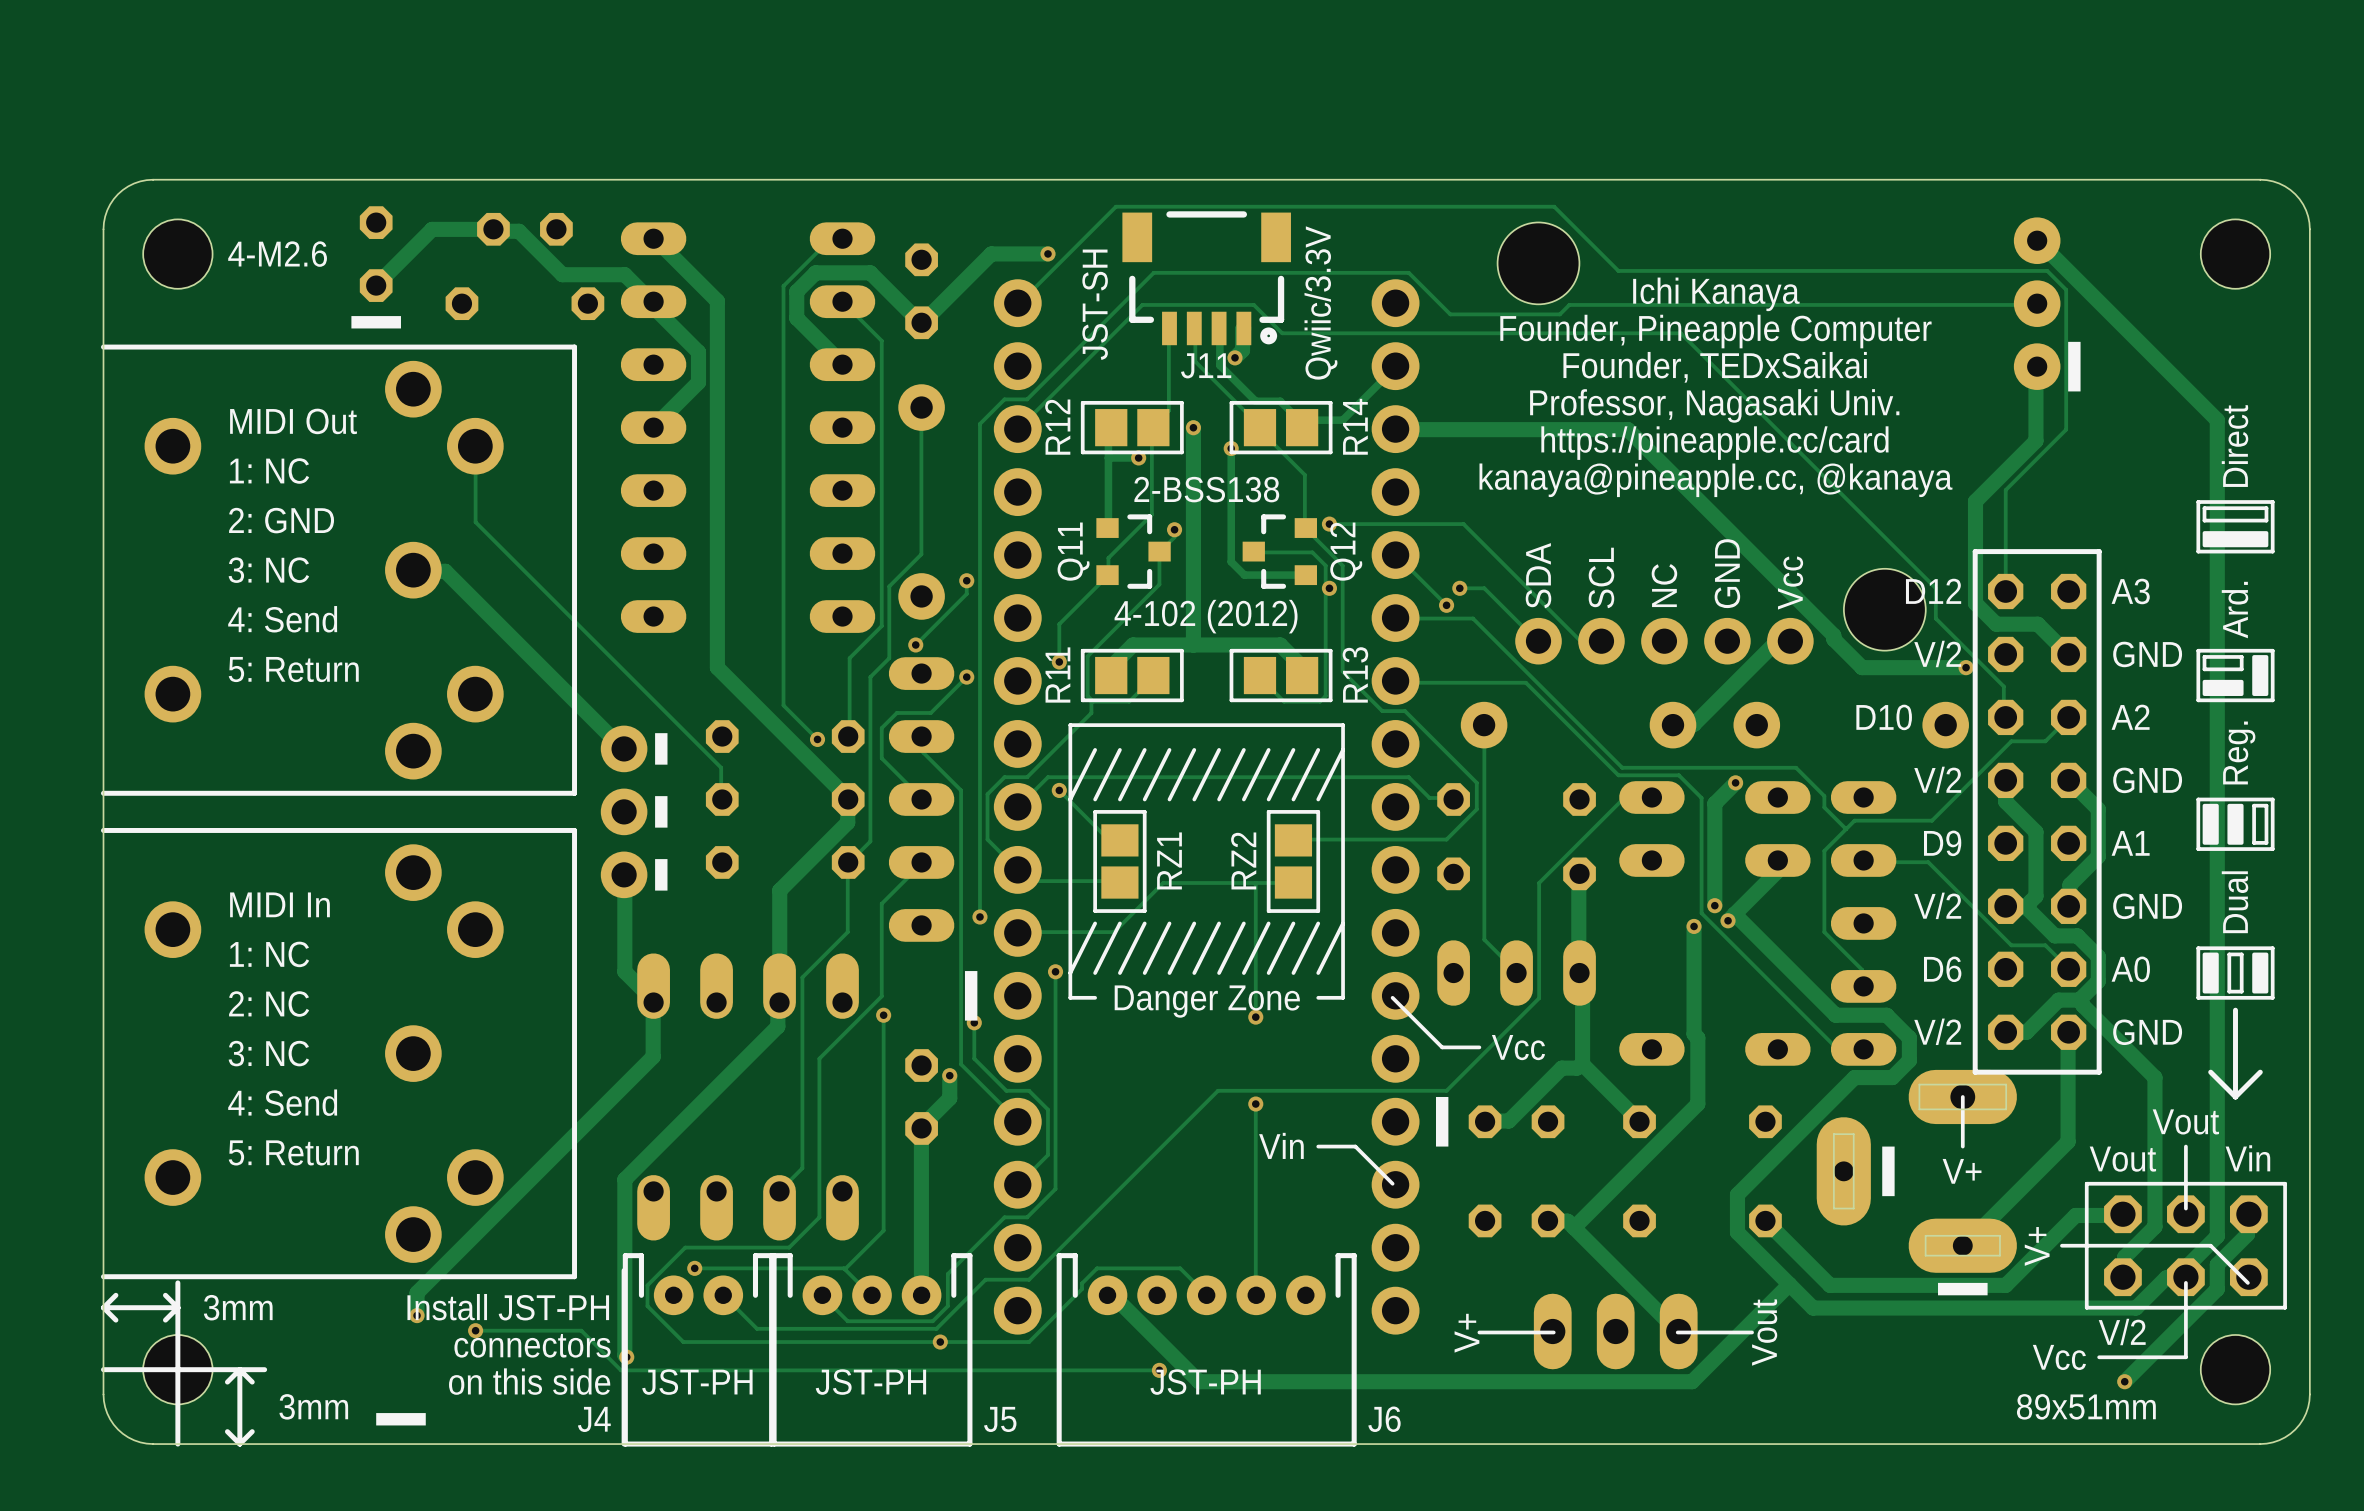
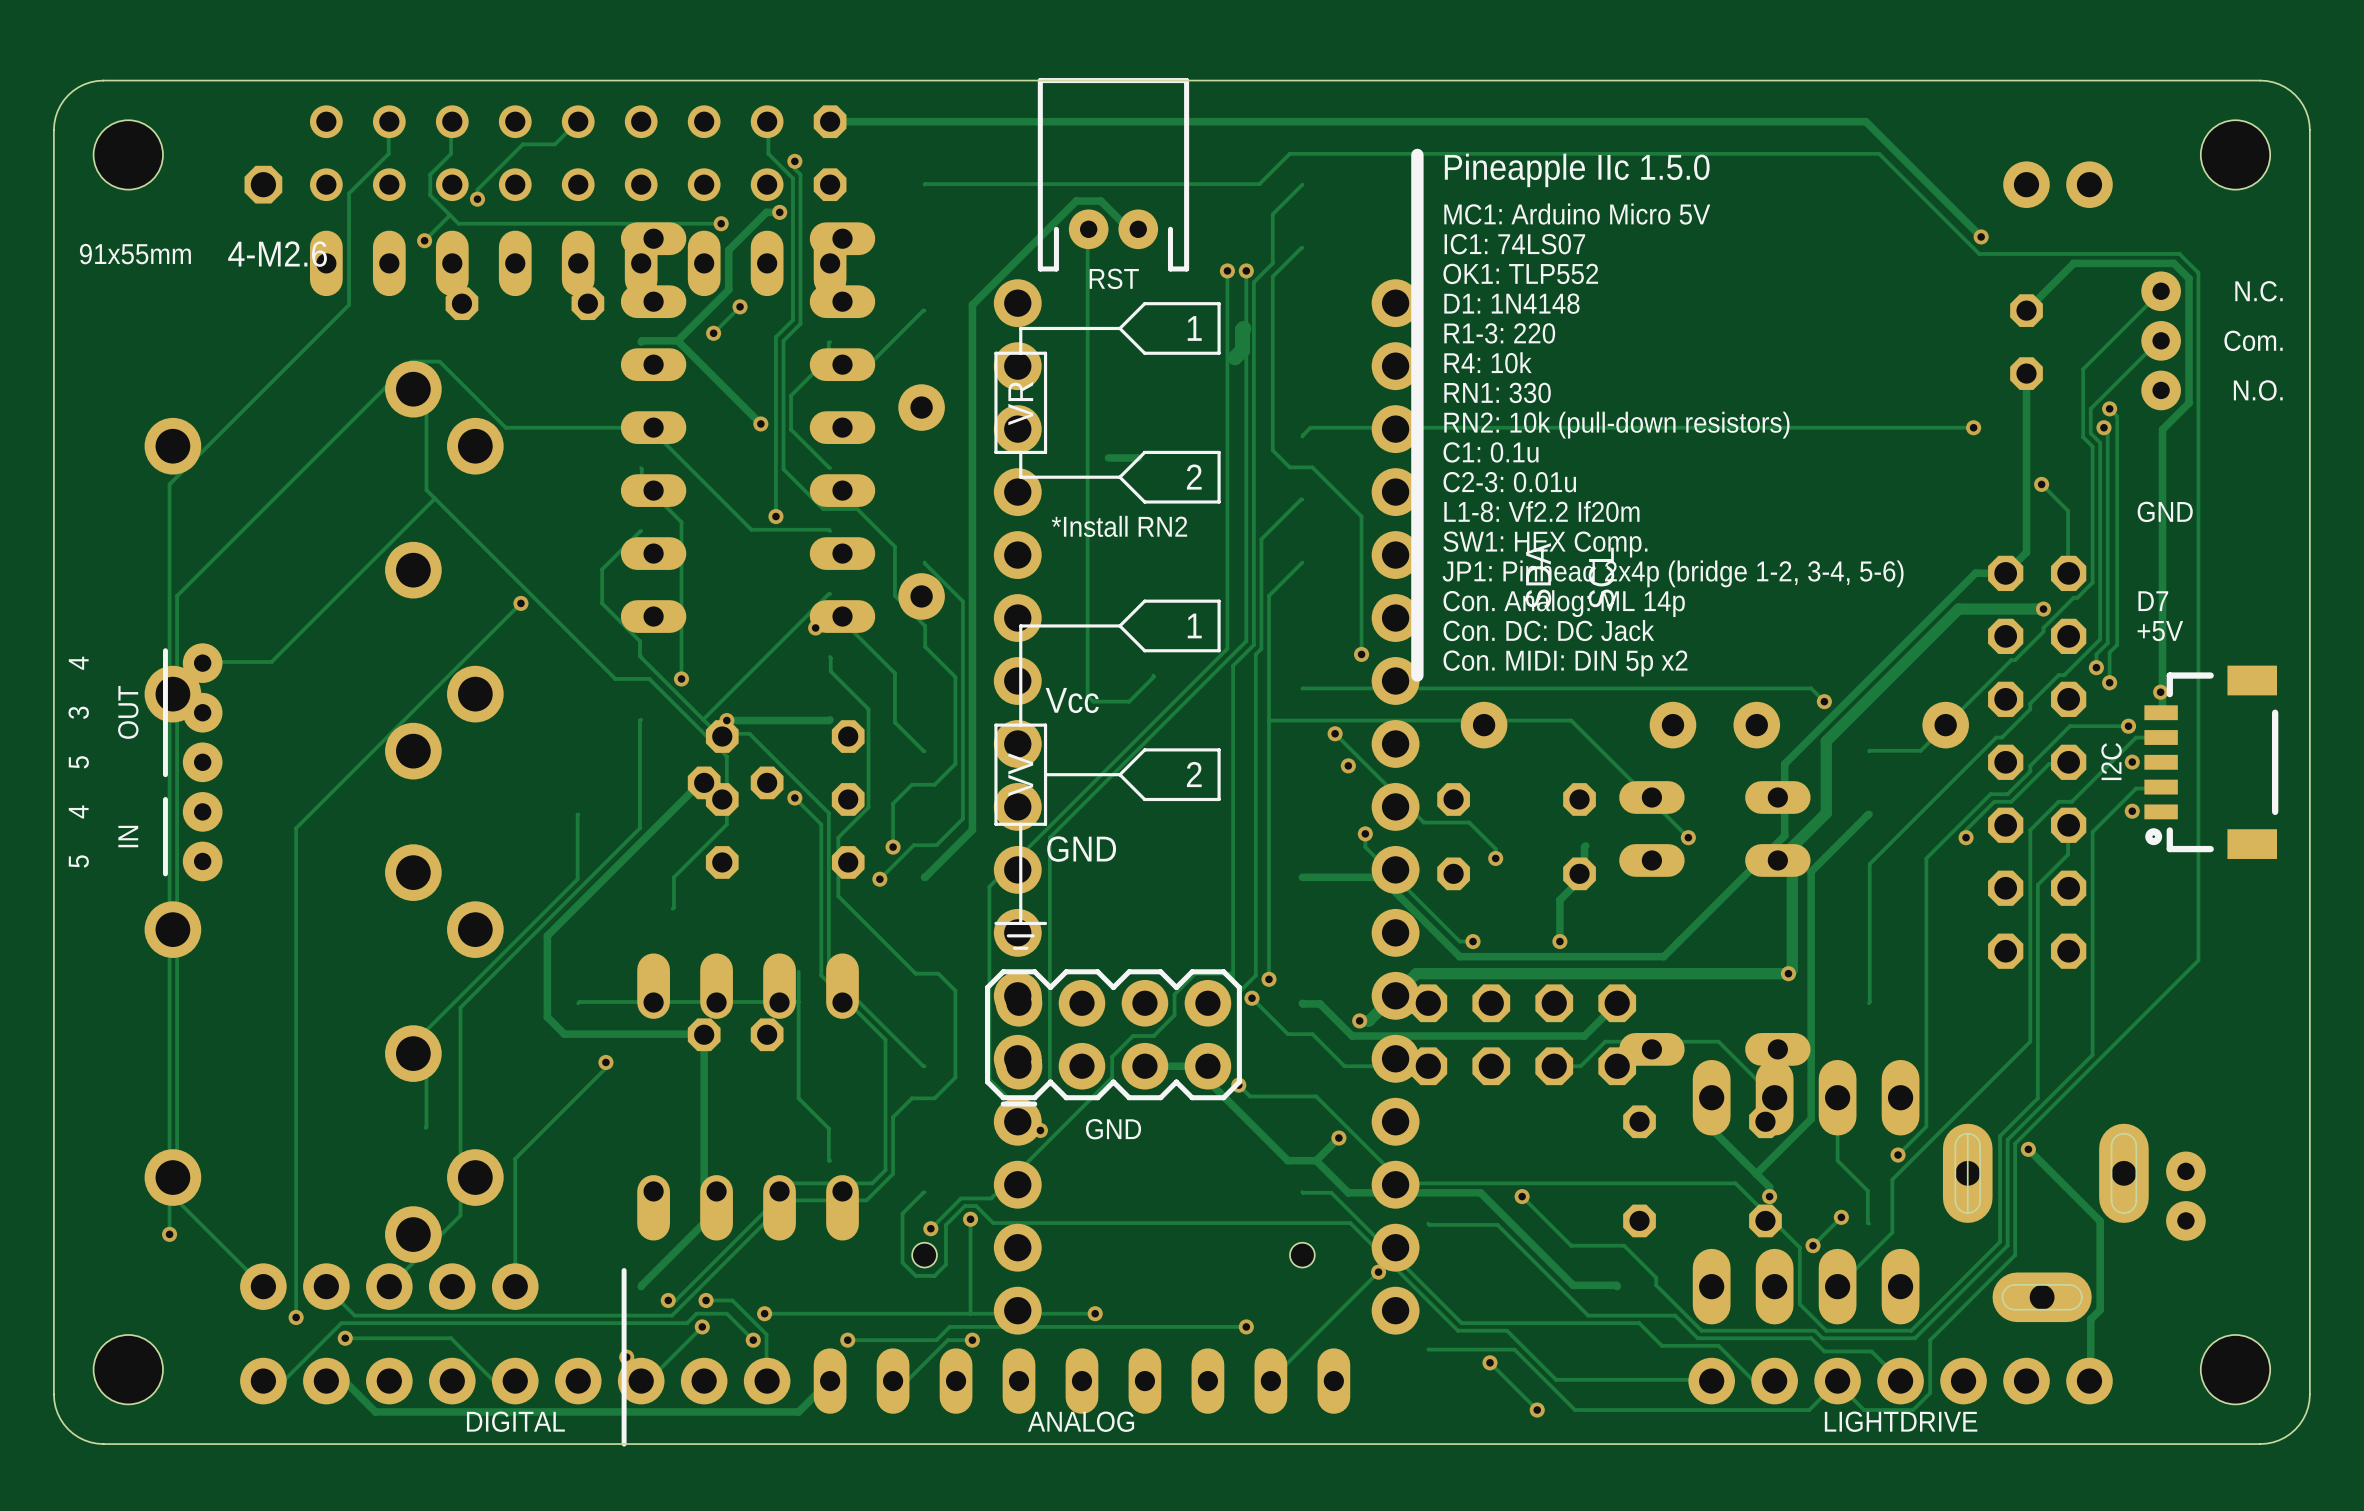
track: none -> (389, 121) (388, 153) (349, 193) (349, 304) (169, 484) (169, 1234)
track: none -> (452, 121) (451, 153) (430, 174) (430, 195) (458, 223) (721, 223)
track: none -> (578, 121) (554, 144) (522, 144) (477, 189) (477, 199)
track: none -> (767, 121) (768, 153) (792, 178) (792, 320) (775, 337) (775, 516)
track: none -> (830, 121) (1865, 121) (1981, 236)
part: none -> (326, 153)
part: none -> (389, 153)
part: none -> (452, 153)
part: none -> (515, 153)
part: none -> (578, 153)
part: none -> (641, 153)
part: none -> (704, 153)
part: none -> (767, 153)
part: none -> (830, 153)
line: none -> (1417, 154) (1417, 675)
via: none -> (794, 161)
text: none -> Pineapple IIc 1.5.0 (1577, 170)
RST: none -> (1113, 174)
part: none -> (263, 184)
track: none -> (924, 184) (1259, 184) (1289, 153) (1879, 153) (1979, 253) (2179, 253) (2198, 272) (2198, 960) (2015, 1143) (2015, 1255) (1930, 1340) (1930, 1393) (1913, 1410) (1864, 1410) (1837, 1383) (1837, 1381)
track: none -> (1302, 184) (1272, 214) (1272, 263) (1253, 282) (1253, 644) (1233, 665) (1233, 979)
part: none -> (2057, 184)
via: none -> (477, 199)
track: none -> (779, 212) (766, 212) (728, 250) (728, 289) (677, 340)
via: none -> (779, 212)
text: none -> MC1: Arduino Micro 5V (1577, 214)
track: none -> (450, 215) (424, 240)
via: none -> (721, 223)
part: (524, 229) -> none
track: none -> (1138, 229) (1136, 227) (1127, 227) (1100, 201) (1076, 201) (972, 304) (972, 830) (924, 877)
board edge: (2309, 229) (2306, 210) (2295, 194) (2279, 183) (2260, 179) (153, 179) (140, 181) (128, 186) (118, 194) (110, 204) (105, 216) (103, 229) (103, 1394) (107, 1413) (118, 1429) (134, 1440) (153, 1444) -> (2309, 229) (2308, 117) (2303, 105) (2290, 90) (2279, 84) (2260, 80) (103, 80) (90, 82) (78, 87) (68, 95) (60, 105) (55, 117) (53, 130) (53, 1394) (55, 1407) (60, 1419) (68, 1429) (78, 1437) (97, 1443) (153, 1444)
via: none -> (1981, 236)
track: (653, 238) (717, 301) (717, 667) (843, 794) (848, 799) (847, 822) (779, 890) (779, 1002) (777, 1026) (624, 1179) (624, 1355) (626, 1357) -> none
track: (842, 238) (830, 238) (783, 286) (783, 340) -> (794, 161) (794, 168) (800, 174) (800, 323) (783, 340)
via: none -> (424, 240)
track: (2037, 240) (2217, 420) (2217, 1236) (2188, 1264) (2185, 1277) (2166, 1277) (2136, 1308) (1813, 1308) (1737, 1232) (1737, 1194) (1854, 1077) (1892, 1077) (1909, 1060) (1909, 1037) (1886, 1015) (1835, 1015) (1734, 914) -> none
text: none -> IC1: 74LS07 (1514, 244)
track: none -> (1302, 247) (1272, 276) (1272, 450) (1289, 467) (1312, 467) (1361, 516) (1361, 654)
track: (1047, 253) (991, 253) (921, 322) (870, 272) (815, 272) (796, 291) (796, 318) (842, 364) -> none
via: (1047, 253) -> none
text: none -> 91x55mm (135, 254)
hole position: (177, 254) -> (128, 154)
part: (376, 254) -> none
hole position: (2235, 254) -> (2235, 154)
part: none -> (578, 263)
part: (1538, 263) -> none
track: none -> (1227, 270) (1227, 648) (989, 886) (989, 1079) (1040, 1130)
via: none -> (1227, 270)
track: none -> (1246, 270) (1246, 641) (1049, 837) (1049, 1085)
via: none -> (1246, 270)
text: none -> OK1: TLP552 (1520, 273)
J11: (1206, 278) -> none
track: (376, 285) (432, 229) (519, 231) (562, 274) (624, 274) (655, 303) (655, 308) (698, 352) (698, 382) (653, 427) -> none
part: (921, 291) -> none
track: none -> (2161, 291) (2083, 369) (2083, 437) (2092, 446) (2092, 582) (2077, 597) (2073, 597) (2043, 627) (2043, 631) (2015, 660) (2011, 660) (1920, 750) (1869, 751)
text: none -> N.C. (2259, 291)
text: Ichi Kanaya (1716, 294) -> none
track: (842, 301) (881, 340) (881, 626) (849, 658) (848, 736) -> none
drawing: none -> [994, 302, 1221, 950]
text: Qwiic/3.3V (1320, 302) -> none
track: (1017, 303) (1115, 206) (1554, 206) (1618, 270) (2047, 270) (2066, 289) (2066, 429) (2005, 490) (2005, 591) -> none
text: none -> D1: 1N4148 (1511, 303)
track: (2037, 303) (1569, 304) (1559, 314) (1450, 314) (1408, 272) (1153, 272) (1027, 399) (1004, 399) (979, 423) (979, 917) -> none
part: (2037, 303) -> none
text: JST-SH (1095, 304) -> none
track: none -> (740, 306) (713, 333)
via: none -> (740, 306)
track: none -> (924, 310) (868, 365)
track: none -> (2026, 310) (2073, 263) (2173, 263) (2188, 278) (2188, 403) (2162, 429) (2161, 712)
drawing: [351, 316, 401, 329] -> none
track: (1169, 328) (1168, 410) (1151, 427) (1151, 514) (1108, 558) (1108, 575) (1059, 624) (1059, 661) -> none
track: (1194, 328) (1195, 361) (1261, 427) (1261, 431) (1304, 474) (1304, 527) (1342, 565) (1342, 671) (1382, 711) (1405, 711) (1476, 782) (1476, 809) (1446, 839) (1293, 840) -> none
track: (1219, 328) (1219, 365) (1255, 401) (1280, 401) (1301, 422) (1302, 427) (1303, 420) (1342, 420) (1395, 366) -> none
text: Founder, Pineapple Computer (1715, 331) -> none
via: none -> (713, 333)
text: none -> R1-3: 220 (1499, 333)
track: none -> (677, 340) (641, 342)
track: none -> (677, 340) (760, 423)
track: none -> (2161, 340) (2160, 342) (2156, 342) (2090, 408) (2090, 433) (2100, 442) (2100, 639) (2064, 675) (2058, 675) (2030, 703) (2030, 709) (2001, 737) (1996, 737) (1869, 864) (1869, 1003)
part: none -> (2161, 340)
text: none -> Com. (2253, 340)
drawing: [2068, 341, 2081, 392] -> none
track: none -> (830, 342) (828, 357) (791, 395) (791, 429) (830, 468)
part: none -> (2026, 342)
line: (103, 347) (574, 347) (574, 793) (103, 793) -> none
via: (1234, 357) -> none
text: none -> R4: 10k (1487, 362)
track: (2037, 366) (2035, 440) (1975, 501) (1975, 603) (1996, 624) (2037, 624) (2068, 654) -> none
text: Founder, TEDxSaikai (1715, 367) -> none
track: none -> (2026, 373) (2026, 552) (2005, 573)
text: none -> N.O. (2258, 390)
text: none -> RN1: 330 (1497, 392)
track: none -> (425, 396) (426, 490) (615, 678) (649, 678) (726, 756) (726, 824) (673, 877) (672, 908)
line: (1181, 402) (1082, 402) (1082, 452) (1181, 452) (1181, 402) -> none
line: (1330, 402) (1231, 402) (1231, 452) (1330, 452) (1330, 402) -> none
text: Professor, Nagasaki Univ. (1714, 405) -> none
track: (921, 407) (921, 554) (889, 586) (889, 658) (870, 677) (870, 841) (847, 864) (847, 932) (802, 977) (802, 1168) (779, 1191) -> none
track: none -> (2109, 408) (2117, 416) (2117, 644) (2109, 652) (2109, 682)
via: none -> (2109, 408)
text: MIDI Out (293, 421) -> none
via: none -> (760, 423)
text: none -> RN2: 10k (pull-down resistors) (1616, 425)
track: (1111, 427) (1108, 429) (1107, 528) -> none
R12: (1132, 427) -> none
track: (1193, 427) (1193, 644) -> none
via: (1193, 427) -> none
R14: (1281, 427) -> none
track: none -> (1973, 427) (1310, 427) (1302, 436)
via: none -> (1973, 427)
track: none -> (2103, 427) (2107, 431) (2107, 643) (2096, 654) (2096, 667)
via: none -> (2103, 427)
track: (1017, 429) (1142, 304) (1253, 304) (1282, 333) (1680, 333) (1935, 588) (1935, 618) (2003, 686) (2003, 716) (2005, 717) -> none
track: (1395, 429) (1627, 429) (1833, 635) (1833, 639) (1862, 667) (1966, 667) -> none
text: https://pineapple.cc/card (1714, 443) -> none
track: (475, 446) (475, 522) (721, 767) (722, 799) -> none
text: Direct (2235, 446) -> none
track: (1231, 448) (1231, 561) (1244, 575) (1305, 575) -> none
via: (1231, 448) -> none
text: none -> C1: 0.1u (1491, 452)
via: (1138, 457) -> none
track: none -> (641, 468) (641, 482) (681, 522) (681, 678)
track: (783, 469) (783, 705) (817, 739) -> (783, 469) (823, 508) (857, 508) (894, 546) (894, 595) (925, 626) (925, 646) (955, 677) (955, 763) (934, 784) (911, 784) (893, 803) (893, 847)
text: 1: NC (269, 471) -> none
text: kanaya@pineapple.cc, @kanaya (1715, 480) -> none
text: none -> C2-3: 0.01u (1509, 482)
track: none -> (2041, 484) (2068, 510) (2068, 573)
via: none -> (2041, 484)
text: 2-BSS138 (1206, 489) -> none
track: none -> (434, 498) (271, 661) (202, 663)
track: none -> (1302, 499) (1261, 539) (1261, 648) (1255, 654) (1255, 883)
line: (2272, 502) (2272, 551) (2198, 551) (2198, 502) (2272, 502) -> none
line: (2266, 508) (2266, 520) (2204, 520) (2204, 508) (2266, 508) -> none
text: none -> L1-8: Vf2.2 If20m (1541, 511)
text: none -> GND (2165, 511)
via: none -> (775, 516)
text: 2: GND (281, 520) -> none
track: (1329, 524) (1463, 524) (1580, 641) (1601, 641) -> none
via: (1329, 524) -> none
track: (1174, 529) (1174, 537) (1159, 551) (1159, 584) (1087, 656) -> (1088, 229) (1087, 656)
via: (1174, 529) -> none
track: none -> (641, 531) (602, 569) (602, 603) (639, 641) (639, 656) (717, 733) (749, 733) (828, 813) (828, 971) (924, 1066)
track: none -> (830, 531) (751, 529) (649, 427) (505, 427) (439, 361) (411, 361) (177, 595) (177, 1200) (263, 1286)
drawing: [2202, 531, 2269, 548] -> none
text: none -> SW1: HEX Comp. (1545, 544)
Q11: (1133, 551) -> none
track: (1253, 551) (1312, 552) (1325, 565) (1325, 695) (1320, 701) (1284, 701) (1259, 675) -> none
Q12: (1279, 551) -> none
line: (2099, 551) (1975, 551) (1975, 1072) (2099, 1072) (2099, 551) -> none
track: (1395, 555) (1446, 605) -> none
track: none -> (924, 562) (962, 601) (962, 818) (936, 845) (913, 845) (879, 879)
track: none -> (1302, 562) (1269, 595) (1269, 979)
text: 3: NC (268, 570) -> none
track: (413, 570) (445, 571) (624, 748) -> none
text: none -> JP1: Pinhead 2x4p (bridge 1-2, 3-4, 5-6) (1673, 573)
text: GND (1727, 573) -> none
track: none -> (2005, 573) (1975, 573) (1784, 763) (1784, 835) (1663, 956) (1459, 956) (1380, 877) (1302, 877)
track: (966, 580) (966, 593) (915, 644) -> none
via: (966, 580) -> none
text: Vcc (1790, 583) -> none
text: NC (1664, 585) -> none
via: (1329, 588) -> none
track: (1459, 588) (1484, 588) (1538, 641) -> none
via: (1459, 588) -> none
text: D12 (1933, 591) -> none
text: A3 (2130, 591) -> none
track: none -> (830, 593) (703, 719)
text: none -> D7 (2153, 601)
track: none -> (520, 603) (296, 828) (296, 1317)
via: none -> (520, 603)
text: none -> Con. Analog: ML 14p (1564, 603)
via: (1446, 605) -> none
part: (1884, 609) -> none
track: none -> (2043, 609) (1958, 609) (1826, 741) (1826, 813) (1792, 847) (1792, 969) (1788, 973) (1416, 973) (1369, 1020) (1359, 1020)
via: none -> (2043, 609)
text: Ard. (2235, 610) -> none
text: 4-102 (2012) (1206, 616) -> none
track: (1395, 618) (1473, 618) (1622, 767) (1796, 767) (1824, 796) (1824, 807) (1846, 829) -> none
text: 4: Send (282, 619) -> none
track: none -> (815, 627) (849, 627) (894, 673) (894, 722) (924, 751)
via: none -> (815, 627)
text: none -> Con. DC: DC Jack (1548, 630)
text: none -> +5V (2160, 631)
part: (1664, 641) -> none
track: (1790, 641) (1777, 641) (1694, 724) (1672, 725) -> none
via: (915, 644) -> none
line: none -> (165, 650) (165, 774)
line: (1181, 650) (1082, 650) (1082, 700) (1181, 700) (1181, 650) -> none
line: (1330, 650) (1330, 700) (1231, 700) (1231, 650) (1330, 650) -> none
line: (2272, 650) (2198, 650) (2198, 700) (2272, 700) (2272, 650) -> none
text: V/2 (1937, 653) -> none
via: none -> (1361, 654)
text: GND (2147, 654) -> none
drawing: [2202, 655, 2269, 696] -> none
track: none -> (830, 656) (830, 671) (868, 709) (868, 807) (838, 837) (838, 896) (915, 973) (938, 973) (955, 990) (955, 1077) (934, 1098) (911, 1098) (893, 1117) (893, 1173) (866, 1200) (787, 1200) (672, 1315) (354, 1315) (326, 1286)
line: (2241, 656) (2204, 656) (2204, 669) (2241, 669) (2241, 656) -> none
via: (1059, 661) -> none
text: none -> 4 (78, 663)
text: none -> Con. MIDI: DIN 5p x2 (1565, 663)
via: (1966, 667) -> none
via: none -> (2096, 667)
text: 5: Return (293, 669) -> none
R11: (1132, 675) -> none
R13: (1281, 675) -> none
track: (1302, 675) (1301, 665) (1280, 644) (1132, 644) (1112, 665) (1111, 675) -> none
track: (966, 677) (930, 712) (896, 712) (881, 728) (881, 758) (921, 799) -> none
via: (966, 677) -> none
via: none -> (681, 678)
track: (1395, 680) (1397, 682) (1525, 682) (1618, 775) (1678, 775) (1701, 797) (1701, 913) (1837, 1049) (1863, 1049) -> none
via: none -> (2109, 682)
track: none -> (1302, 688) (1811, 688) (1824, 701)
via: none -> (2160, 692)
track: (1092, 700) (1091, 712) (1027, 777) (1004, 777) (987, 794) (987, 839) (1029, 881) (1119, 882) -> none
via: none -> (1824, 701)
text: none -> 3 (78, 712)
text: none -> OUT (128, 712)
text: D10 (1884, 717) -> none
track: (2068, 717) (2045, 741) (2011, 741) (1932, 820) (1854, 820) (1824, 850) (1824, 932) (1862, 969) (1863, 986) -> none
text: A2 (2130, 717) -> none
track: none -> (641, 719) (639, 828) (460, 1007) (460, 1215) (389, 1286)
track: none -> (830, 719) (726, 720)
via: none -> (726, 720)
track: none -> (1269, 720) (1571, 720) (1688, 837)
track: (1484, 725) (1484, 939) (1516, 973) -> none
track: none -> (2128, 726) (2069, 726) (2030, 765) (2030, 771) (2007, 794) (1990, 794) (1926, 858) (1926, 1126) (1898, 1155)
via: none -> (2128, 726)
drawing: [655, 733, 668, 765] -> none
track: none -> (1335, 733) (1423, 822) (1469, 822) (1495, 849) (1495, 858)
via: none -> (1335, 733)
track: (921, 736) (923, 737) (923, 752) (961, 790) (961, 1064) (1017, 1121) -> none
track: none -> (2160, 737) (2136, 737) (2071, 801) (2058, 801) (2030, 830) (2030, 1041) (1892, 1179) (1892, 1232) (1837, 1286)
via: (817, 739) -> none
line: (1095, 749) (1070, 799) -> none
line: (1119, 749) (1095, 799) -> none
line: (1144, 749) (1119, 799) -> none
line: (1169, 749) (1144, 799) -> none
line: (1194, 749) (1169, 799) -> none
line: (1219, 749) (1194, 799) -> none
line: (1243, 749) (1219, 799) -> none
line: (1268, 749) (1243, 799) -> none
line: (1293, 749) (1268, 799) -> none
line: (1318, 749) (1293, 799) -> none
line: (1343, 749) (1318, 799) -> none
text: Reg. (2239, 752) -> none
text: none -> 5 (78, 762)
part: none -> (202, 762)
part: none -> (2037, 762)
track: none -> (2068, 762) (2068, 763) (2049, 763) (2011, 801) (1994, 801) (1966, 830) (1966, 837)
via: none -> (2132, 762)
I2C: none -> (2211, 762)
via: none -> (1348, 765)
text: V/2 (1937, 779) -> none
track: (2005, 780) (2005, 801) (2035, 831) (2035, 896) (2026, 907) -> none
track: (2068, 780) (2098, 809) (2098, 856) (2069, 884) (2068, 906) -> none
text: GND (2147, 780) -> none
track: none -> (704, 782) (700, 782) (547, 935) (547, 1017) (564, 1034) (704, 1034) (704, 1223) (641, 1286)
part: none -> (735, 782)
track: (1735, 782) (1714, 803) (1714, 905) -> none
via: (1735, 782) -> none
track: none -> (2161, 787) (2136, 788) (2092, 831) (2092, 1054) (2007, 1139) (2007, 1245) (1915, 1338) (1822, 1338) (1814, 1330) (1701, 1330) (1656, 1285) (1656, 1277) (1624, 1245) (1571, 1245) (1522, 1196)
track: (1059, 790) (1108, 839) (1119, 840) -> none
via: (1059, 790) -> none
drawing: [655, 796, 668, 828] -> none
track: none -> (794, 797) (821, 824) (821, 975) (885, 1039) (885, 1170) (872, 1183) (792, 1183) (675, 1300) (668, 1300)
via: none -> (794, 797)
track: (1651, 797) (1624, 797) (1539, 883) (1539, 998) (1446, 1090) (1217, 1090) (1029, 1279) (985, 1279) (936, 1328) (757, 1328) (723, 1295) -> none
part: (921, 799) -> none
track: (1453, 799) (1429, 797) (1408, 777) (1047, 777) (1017, 806) -> none
line: (2272, 799) (2272, 849) (2198, 849) (2198, 799) (2272, 799) -> none
drawing: [2202, 803, 2244, 845] -> none
line: (2266, 805) (2266, 842) (2254, 842) (2254, 805) (2266, 805) -> none
text: none -> 4 (78, 811)
part: (624, 811) -> none
line: (1144, 811) (1095, 811) (1095, 911) (1144, 911) (1144, 811) -> none
line: (1318, 811) (1268, 811) (1268, 911) (1318, 911) (1318, 811) -> none
part: (2037, 811) -> none
via: none -> (2132, 811)
track: none -> (578, 814) (577, 879) (426, 1030) (425, 1127)
track: none -> (1869, 814) (1811, 871) (1811, 1119) (1756, 1173)
line: (103, 830) (574, 830) (574, 1276) (103, 1276) -> none
track: none -> (1365, 833) (1365, 847) (1459, 941) (1473, 941)
via: none -> (1365, 833)
text: none -> IN (128, 836)
via: none -> (1688, 837)
via: none -> (1966, 837)
text: D9 (1942, 843) -> none
text: A1 (2130, 843) -> none
track: none -> (1585, 845) (1584, 875) (1559, 900) (1559, 941)
via: none -> (893, 847)
via: none -> (1495, 858)
drawing: [655, 859, 668, 891] -> none
track: (1777, 860) (1777, 871) (1728, 920) -> none
track: (1863, 860) (1864, 862) (1928, 862) (2011, 945) (2045, 945) (2068, 969) -> none
text: none -> 5 (78, 861)
RZ1: (1119, 861) -> none
RZ2: (1293, 861) -> none
track: (921, 862) (881, 903) (881, 996) (819, 1058) (819, 1217) (789, 1247) (685, 1247) (647, 1285) (647, 1306) (683, 1342) (1029, 1342) (1081, 1289) (1081, 1283) (1097, 1268) (1180, 1268) (1206, 1294) -> none
track: (1579, 873) (1578, 971) (1582, 979) (1582, 1064) -> none
track: (624, 874) (624, 971) (653, 1002) (653, 1056) (417, 1292) (417, 1315) -> none
via: none -> (879, 879)
track: (1293, 882) (1163, 883) (1114, 932) (1017, 932) -> none
text: Dual (2235, 902) -> none
text: MIDI In (279, 904) -> none
via: (1714, 905) -> none
text: V/2 (1937, 905) -> none
text: GND (2147, 906) -> none
track: (2026, 907) (2054, 935) (2077, 935) (2098, 956) (2098, 981) (2079, 1000) -> none
via: (979, 917) -> none
via: (1728, 920) -> none
line: (1095, 923) (1070, 973) -> none
line: (1119, 923) (1095, 973) -> none
line: (1144, 923) (1119, 973) -> none
line: (1169, 923) (1144, 973) -> none
line: (1194, 923) (1169, 973) -> none
line: (1219, 923) (1194, 973) -> none
line: (1243, 923) (1219, 973) -> none
line: (1268, 923) (1243, 973) -> none
line: (1293, 923) (1268, 973) -> none
line: (1318, 923) (1293, 973) -> none
line: (1343, 923) (1318, 973) -> none
part: (1863, 923) -> none
track: (1694, 926) (1694, 1034) (1697, 1037) (1697, 1104) (1574, 1227) -> none
via: (1694, 926) -> none
via: none -> (1473, 941)
via: none -> (1559, 941)
line: (2272, 948) (2272, 997) (2198, 997) (2198, 948) (2272, 948) -> none
drawing: [2202, 952, 2219, 994] -> none
drawing: [2252, 952, 2269, 994] -> none
text: 1: NC (269, 954) -> none
line: (2241, 954) (2241, 991) (2229, 991) (2229, 954) (2241, 954) -> none
text: D6 (1942, 969) -> none
text: A0 (2130, 969) -> none
track: none -> (798, 971) (798, 1098) (828, 1128) (830, 1160)
drawing: [964, 971, 978, 1021] -> none
track: (1055, 971) (1055, 1189) (1027, 1217) (1004, 1217) (947, 1274) (947, 1306) (932, 1321) (847, 1321) (822, 1295) -> none
via: (1055, 971) -> none
track: none -> (1233, 973) (1195, 973) (1174, 994) (1174, 1015) (1153, 1036) (1132, 1036) (1112, 1056) (1112, 1077) (991, 1198) (961, 1198) (930, 1228)
part: (1516, 973) -> none
via: none -> (1788, 973)
track: (1255, 975) (1255, 1017) -> (1255, 975) (1238, 992) (1238, 1085) (1250, 1096) (1316, 1096) (1403, 1183) (1735, 1183) (1799, 1247) (1799, 1304) (1826, 1330) (1911, 1330) (2000, 1241) (2000, 1136) (2037, 1098) (2037, 884) (2068, 854) (2068, 825)
via: none -> (1269, 979)
line: (1318, 997) (1343, 997) (1343, 725) (1070, 725) (1070, 997) (1095, 997) -> none
line: (1392, 997) (1442, 1047) (1479, 1047) -> none
track: none -> (1252, 998) (1287, 1034) (1312, 1034) (1344, 1066) (1428, 1066)
track: (2079, 1000) (2058, 1000) (2026, 1032) (2005, 1032) -> none
track: (2079, 1000) (2154, 1077) (2154, 1226) (2124, 1257) (2124, 1275) (2122, 1277) -> none
text: Danger Zone (1207, 1001) -> none
track: none -> (798, 1002) (578, 1003)
track: none -> (1617, 1003) (1584, 1036) (1352, 1036) (1320, 1003) (1302, 1003)
text: 2: NC (269, 1004) -> none
line: (2235, 1010) (2235, 1096) -> none
track: (883, 1015) (883, 1230) (844, 1269) -> none
via: (883, 1015) -> none
via position: (1255, 1017) -> (1252, 998)
via: none -> (1359, 1020)
track: (974, 1022) (974, 1058) (1006, 1090) (1029, 1090) (1047, 1109) (1047, 1155) (1017, 1184) -> none
via: (974, 1022) -> none
text: V/2 (1937, 1031) -> none
track: (2068, 1032) (2068, 1141) (1962, 1245) -> none
text: GND (2147, 1032) -> none
part: none -> (735, 1034)
part: none -> (1522, 1034)
GND: none -> (1113, 1037)
text: Vcc (1518, 1047) -> none
text: 3: NC (268, 1053) -> none
track: none -> (605, 1062) (605, 1068) (515, 1158) (515, 1286)
via: none -> (605, 1062)
track: (1582, 1064) (1639, 1121) -> none
track: (1582, 1064) (1576, 1068) (1561, 1068) (1508, 1121) (1485, 1121) -> none
track: none -> (1144, 1066) (1208, 1066) (1208, 1081) (1287, 1160) (1316, 1160)
track: none -> (1554, 1066) (1580, 1066) (1605, 1041) (1718, 1041) (1774, 1097)
line: (2210, 1072) (2235, 1096) -> none
line: (2260, 1072) (2235, 1096) -> none
track: (949, 1075) (949, 1098) (921, 1128) -> none
via: (949, 1075) -> none
part: (921, 1096) -> none
drawing: [1435, 1096, 1449, 1147] -> none
line: (1962, 1096) (1962, 1146) -> none
track: none -> (1711, 1097) (1712, 1130) (1769, 1187) (1769, 1196)
part: none -> (1806, 1097)
track: none -> (1837, 1097) (1837, 1160) (1867, 1190) (1869, 1223)
text: 4: Send (282, 1102) -> none
track: (1255, 1104) (1256, 1295) -> none
via position: (1255, 1104) -> (1238, 1085)
part: (1516, 1121) -> none
text: Vout (2185, 1121) -> none
track: (921, 1128) (921, 1295) -> none
via: none -> (1040, 1130)
track: none -> (1338, 1138) (1316, 1160)
via: none -> (1338, 1138)
text: Vin (1281, 1145) -> none
line: (1318, 1146) (1355, 1146) (1392, 1183) -> none
drawing: [1882, 1146, 1895, 1197] -> none
line: (2185, 1146) (2185, 1208) -> none
track: none -> (2028, 1149) (2100, 1221) (2100, 1309) (2090, 1319) (2089, 1381)
via: none -> (2028, 1149)
text: 5: Return (293, 1152) -> none
via: none -> (1898, 1155)
text: Vin (2247, 1158) -> none
text: Vout (2122, 1159) -> none
track: none -> (1316, 1160) (1348, 1192) (1480, 1192) (1573, 1285) (1617, 1286)
part: (1916, 1171) -> none
text: V+ (1962, 1171) -> none
line: (2285, 1183) (2086, 1183) (2086, 1307) (2285, 1307) (2285, 1183) -> none
track: none -> (924, 1192) (902, 1213) (902, 1262) (915, 1275) (934, 1275) (945, 1264) (945, 1224) (964, 1206) (976, 1206) (993, 1223) (1350, 1223) (1457, 1330) (1507, 1330) (1556, 1379) (1711, 1381)
track: none -> (1302, 1192) (1331, 1192) (1461, 1323) (1639, 1323) (1661, 1345) (1718, 1345) (1752, 1379) (1774, 1381)
via: none -> (1522, 1196)
via: none -> (1769, 1196)
part: none -> (2185, 1196)
track: (2122, 1214) (2075, 1215) (2005, 1285) (1830, 1285) (1765, 1221) -> none
track: (2248, 1214) (2247, 1234) (2217, 1264) (2217, 1289) (2124, 1381) -> none
track: none -> (1841, 1217) (1813, 1245)
via: none -> (1841, 1217)
track: none -> (970, 1219) (970, 1313)
via: none -> (970, 1219)
part: (1516, 1220) -> none
track: (1548, 1220) (1567, 1221) (1678, 1331) -> none
part: none -> (2045, 1222)
track: none -> (1428, 1223) (1497, 1224) (1588, 1315) (1675, 1315) (1697, 1338) (1811, 1338) (1824, 1351) (1871, 1351) (1900, 1381)
via: none -> (930, 1228)
via: none -> (169, 1234)
via: none -> (1813, 1245)
line: (2061, 1245) (2210, 1245) (2247, 1282) -> none
part: (2185, 1245) -> none
text: V+ (2037, 1246) -> none
hole: none -> (924, 1255)
hole: none -> (1302, 1255)
track: (694, 1268) (843, 1268) (872, 1295) -> none
via: (694, 1268) -> none
track: none -> (1378, 1272) (1270, 1381)
via: none -> (1378, 1272)
line: (177, 1282) (177, 1444) -> none
drawing: [1938, 1282, 1988, 1296] -> none
line: (2185, 1282) (2185, 1357) (2099, 1357) -> none
track: (1789, 1284) (1692, 1381) (1199, 1381) (1114, 1296) (1107, 1295) -> none
part: none -> (389, 1286)
part: none -> (1806, 1286)
line: (115, 1295) (103, 1307) -> none
line: (165, 1295) (177, 1307) -> none
via: none -> (668, 1300)
track: none -> (706, 1300) (732, 1300) (766, 1334) (767, 1381)
via: none -> (706, 1300)
line: (103, 1307) (115, 1320) -> none
line: (177, 1307) (103, 1307) -> none
line: (177, 1307) (165, 1320) -> none
text: 3mm (238, 1307) -> none
text: Install JST-PH (508, 1307) -> none
via: none -> (764, 1313)
track: none -> (1095, 1313) (764, 1313)
via: none -> (1095, 1313)
via: (417, 1315) -> none
via: none -> (296, 1317)
track: none -> (702, 1326) (649, 1379) (641, 1381)
via: none -> (702, 1326)
track: none -> (1246, 1326) (949, 1326) (936, 1340) (847, 1340)
via: none -> (1246, 1326)
track: (475, 1330) (581, 1330) (621, 1370) (1159, 1370) -> none
via: (475, 1330) -> none
part: (1615, 1331) -> none
line: (1553, 1332) (1479, 1332) -> none
line: (1752, 1332) (1677, 1332) -> none
text: Vout (1764, 1332) -> none
text: V/2 (2122, 1332) -> none
text: V+ (1466, 1333) -> none
track: none -> (345, 1338) (451, 1338) (492, 1379) (515, 1381)
via: none -> (345, 1338)
track: none -> (753, 1340) (726, 1313) (696, 1313) (687, 1323) (341, 1323) (284, 1379) (263, 1381)
via: none -> (753, 1340)
via: none -> (847, 1340)
track: none -> (972, 1340) (947, 1340) (908, 1379) (893, 1381)
via position: (940, 1342) -> (972, 1340)
text: connectors (532, 1345) -> none
J4: (698, 1349) -> none
J5: (872, 1349) -> none
J6: (1206, 1349) -> none
track: none -> (1428, 1349) (1514, 1349) (1575, 1410) (1809, 1410) (1837, 1381)
text: Vcc (2059, 1357) -> none
track: none -> (1490, 1362) (1537, 1410)
via: none -> (1490, 1362)
hole position: (177, 1369) -> (128, 1369)
line: (239, 1369) (239, 1444) -> (165, 799) (165, 873)
line: (239, 1369) (252, 1382) -> none
line: (239, 1369) (227, 1382) -> none
line: (264, 1369) (103, 1369) -> none
via: (1159, 1370) -> none
part: none -> (515, 1381)
text: on this side (529, 1381) -> none
track: none -> (830, 1381) (798, 1411) (375, 1411) (345, 1381) (326, 1381)
part: none -> (1081, 1381)
part: none -> (1900, 1381)
via: (2124, 1381) -> none
text: JST-PH (697, 1382) -> none
text: JST-PH (870, 1382) -> none
text: JST-PH (1205, 1382) -> none
text: 3mm (313, 1406) -> none
text: 89x51mm (2086, 1406) -> none
via: none -> (1537, 1410)
drawing: [376, 1413, 426, 1426] -> none
text: none -> DIGITAL (515, 1421)
text: none -> ANALOG (1081, 1421)
text: none -> LIGHTDRIVE (1901, 1421)
line: (227, 1431) (239, 1444) -> none
line: (252, 1431) (239, 1444) -> none

